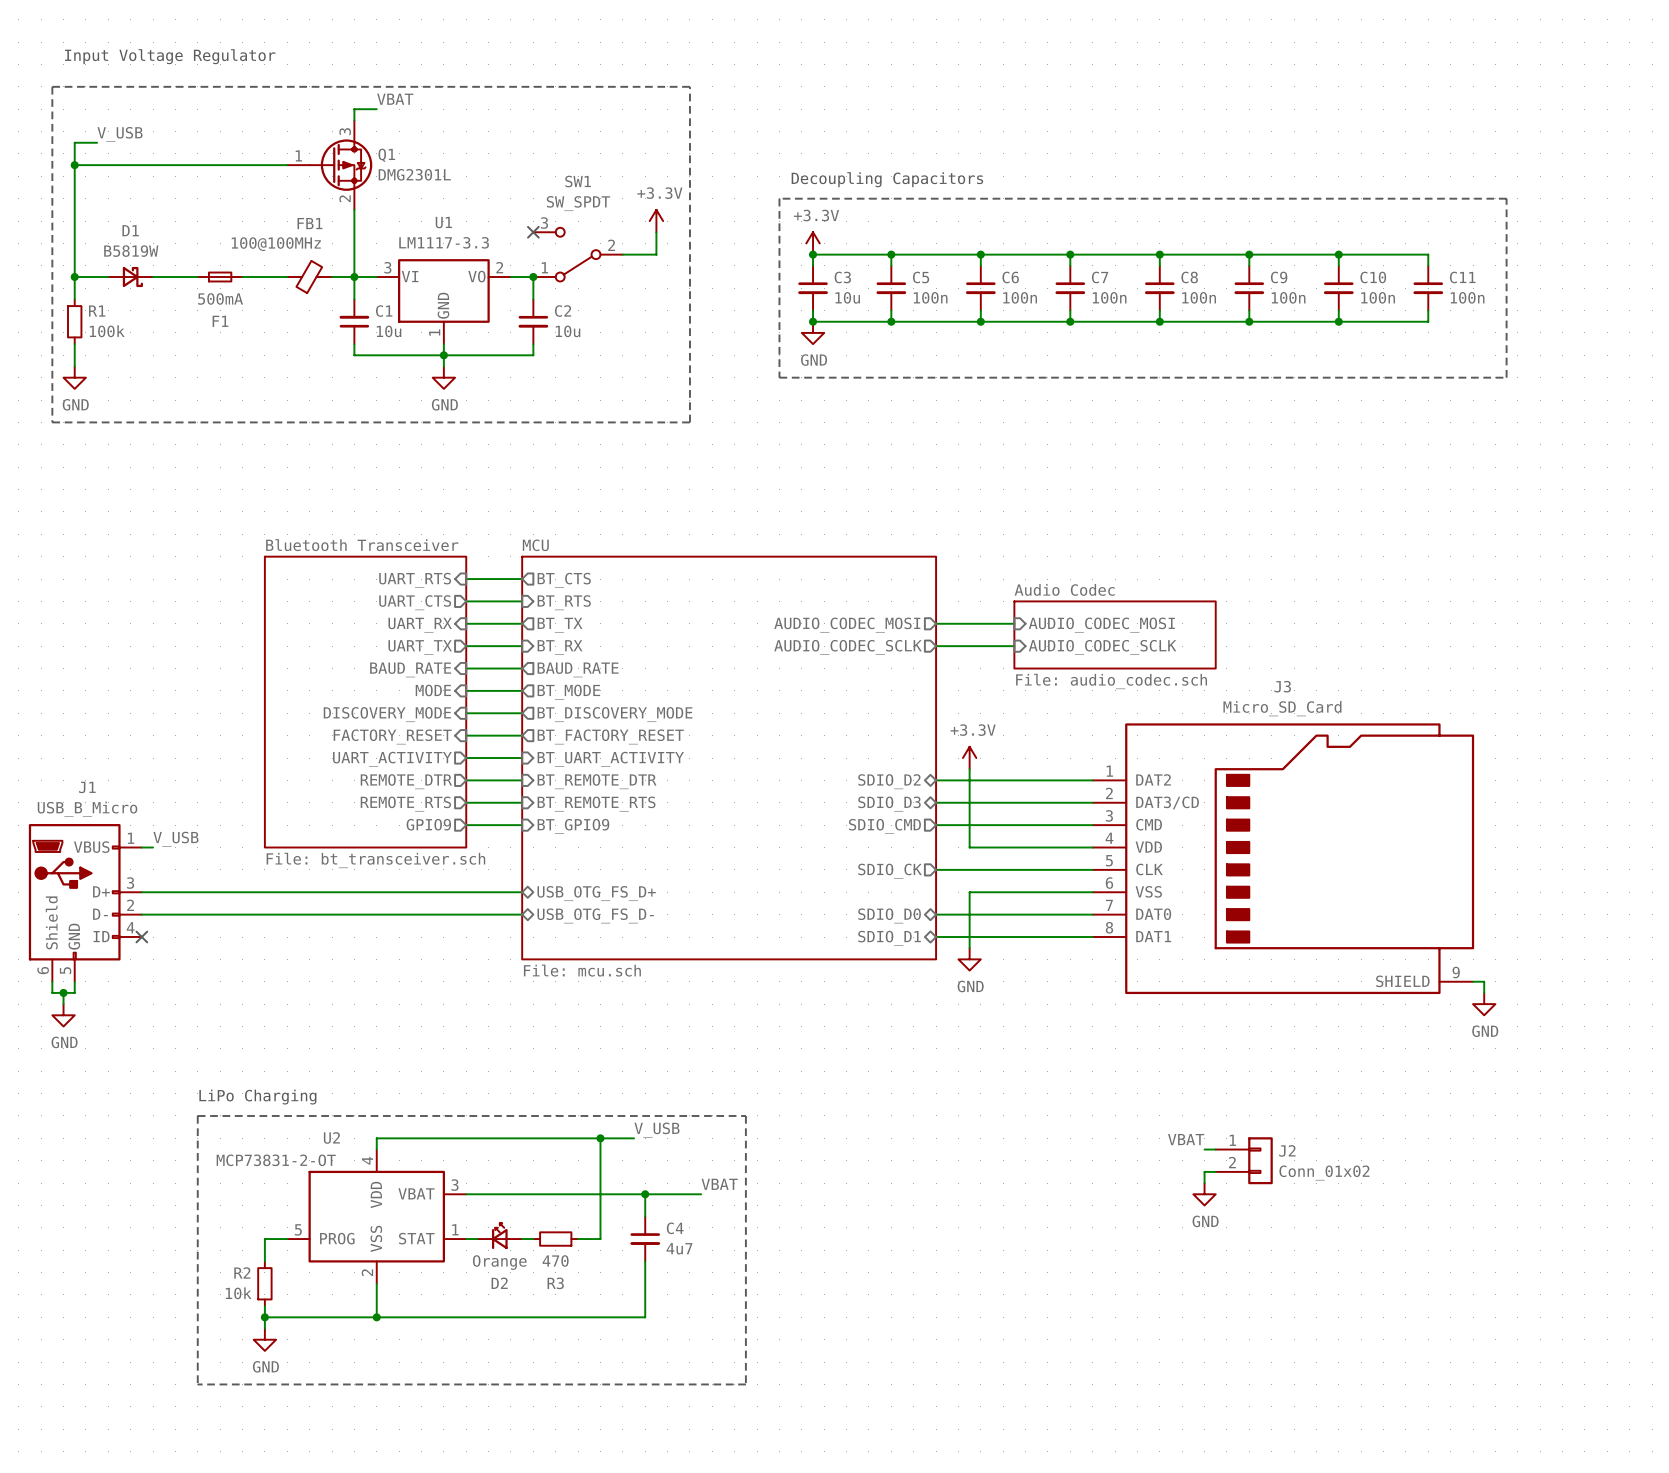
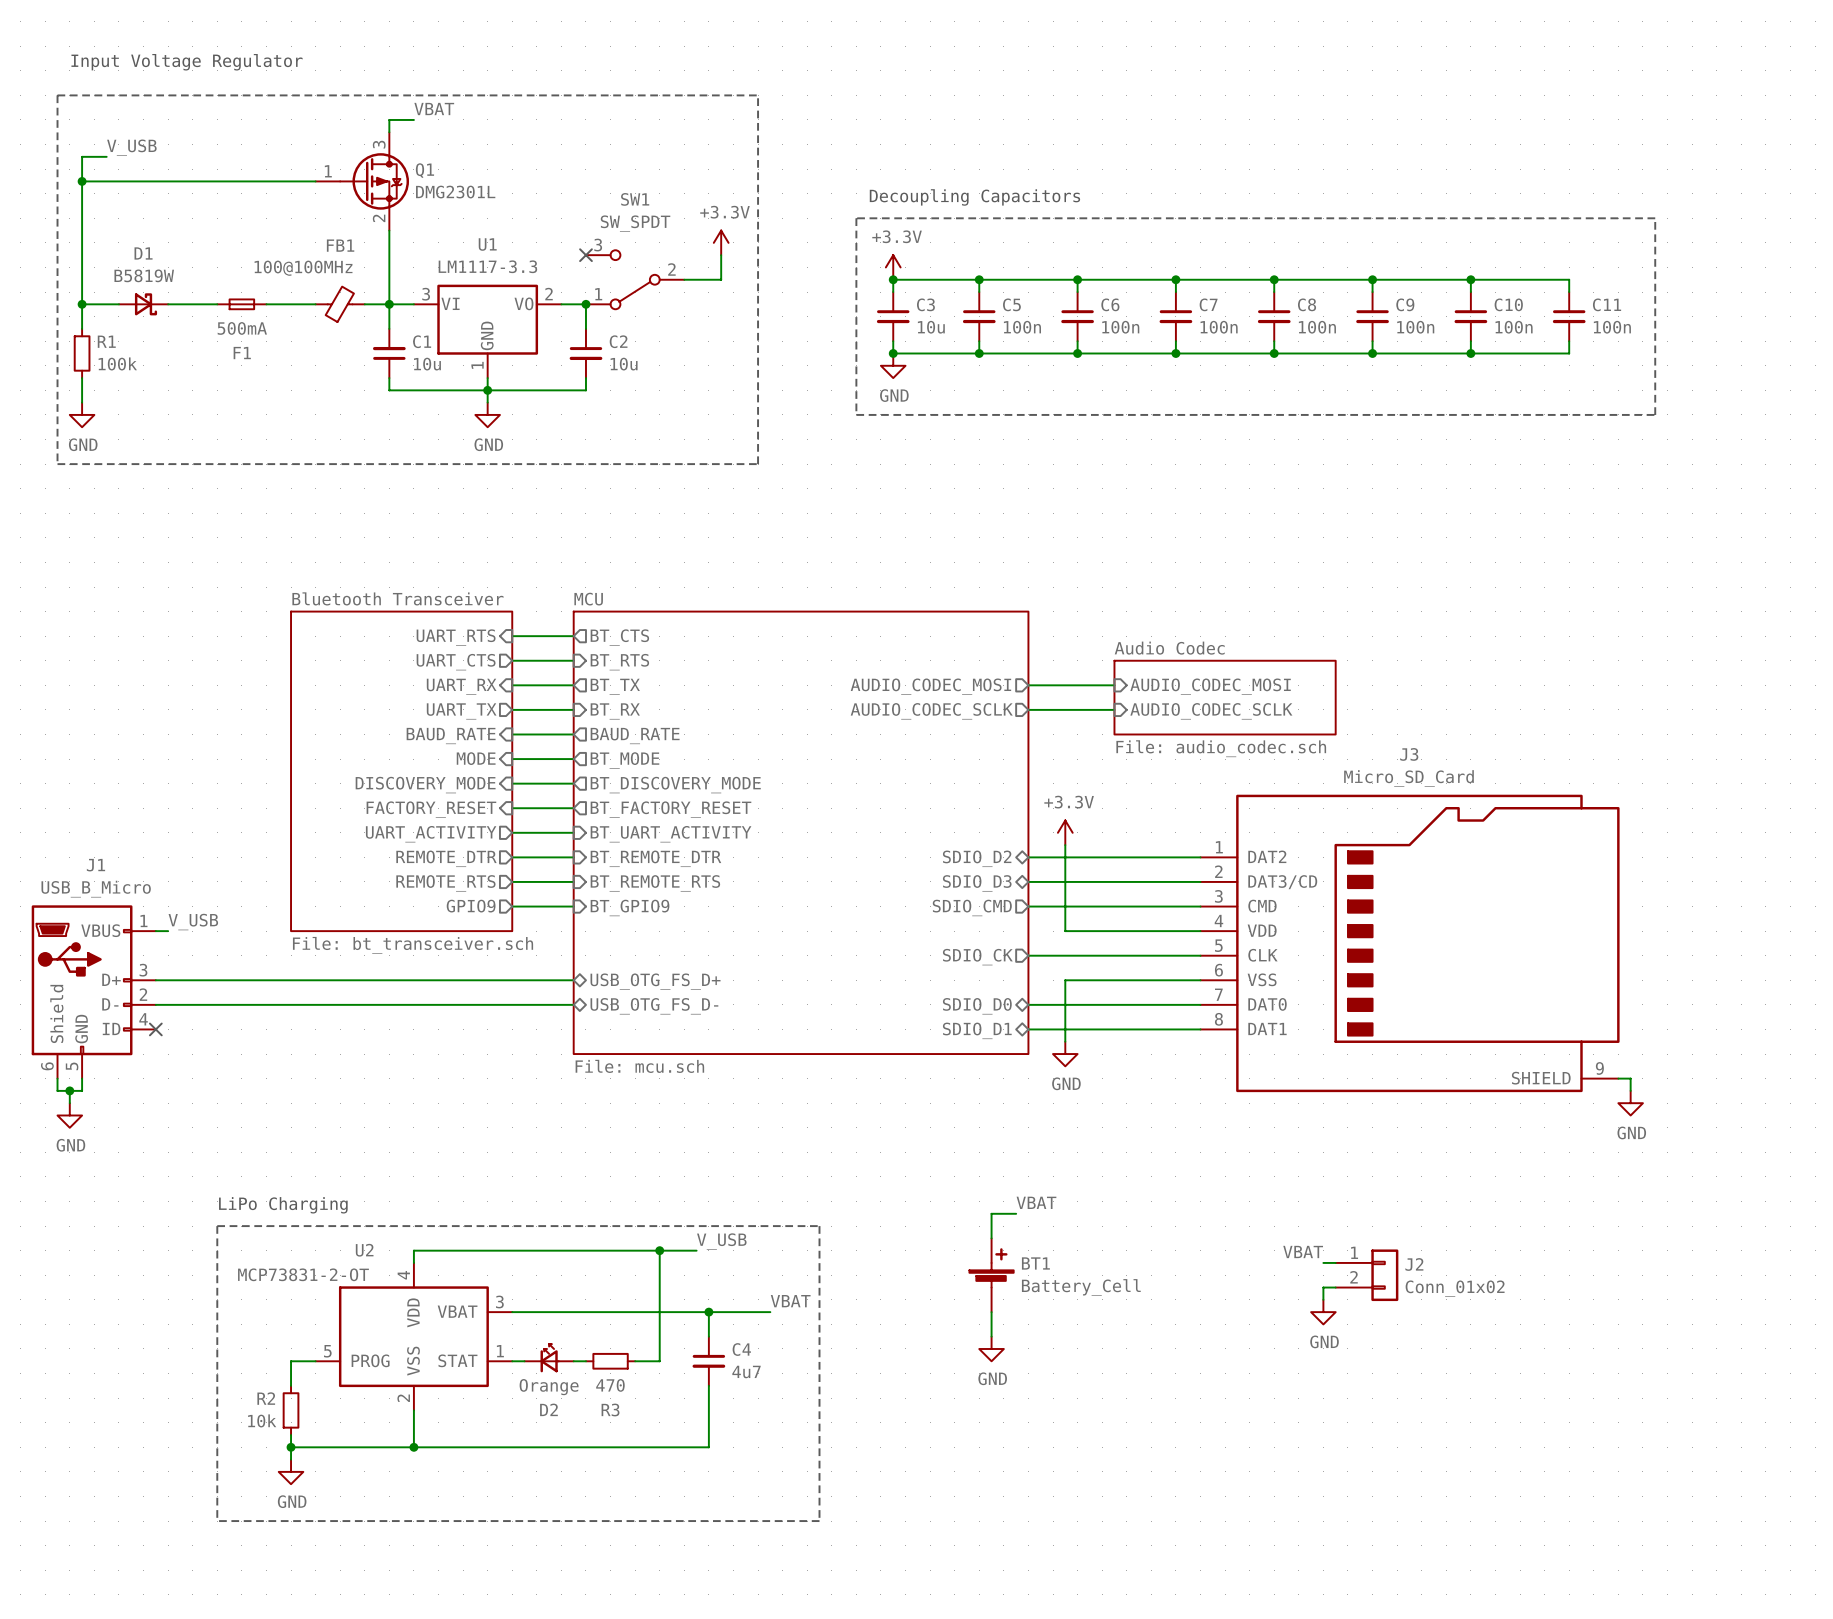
label: none -> VBAT (1036, 1202)
wire: none -> (1016, 1213) (991, 1213) (991, 1238)
BT1: none -> Battery_Cell (991, 1275)
wire: none -> (991, 1312) (991, 1336)
power symbol: none -> GND (991, 1348)

